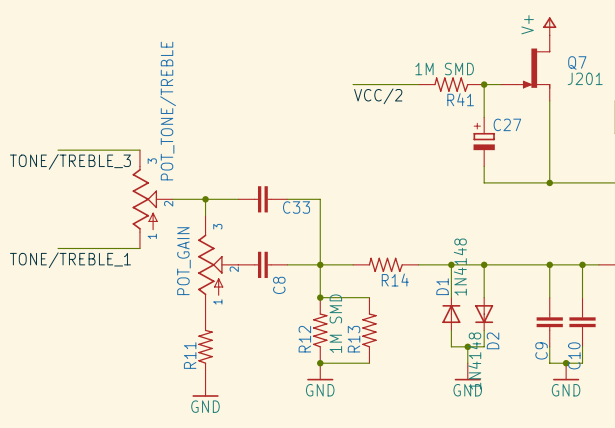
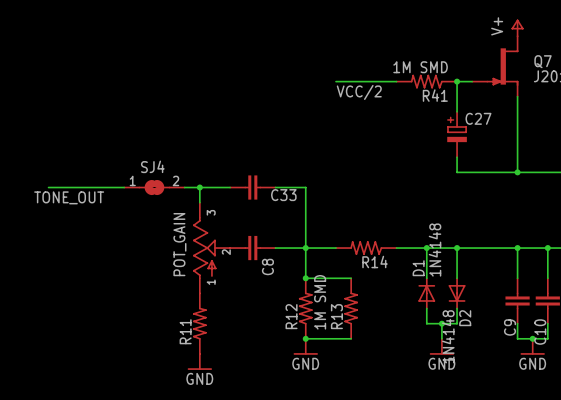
wire: (58, 150) (139, 150) -> none
label: TONE/TREBLE_3 (70, 161) -> none
POT_TONE/TREBLE: (152, 199) -> none
SJ4: none -> (154, 187)
label: none -> TONE_OUT (69, 197)
wire: (58, 248) (139, 248) -> (48, 187) (124, 187)
label: TONE/TREBLE_1 (70, 260) -> none

